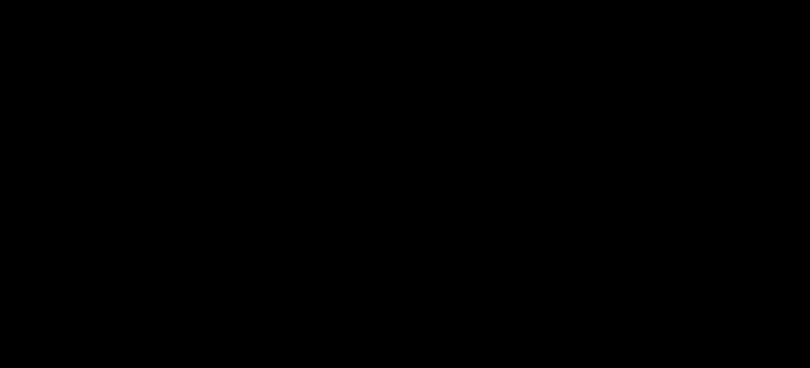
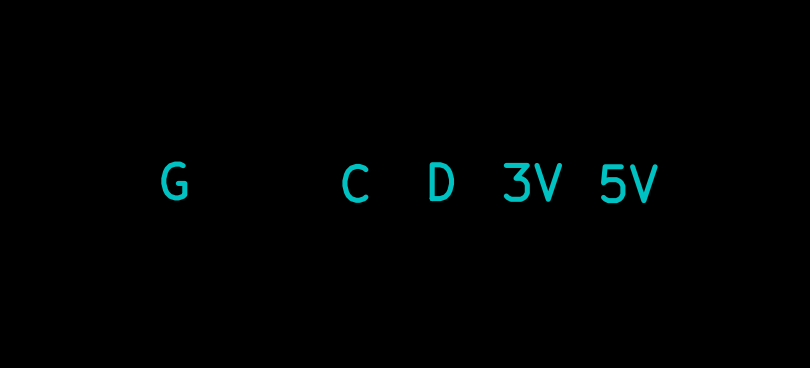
text: none -> G (174, 181)
text: none -> D (441, 181)
text: none -> 3V (532, 182)
text: none -> C (355, 183)
text: none -> 5V (629, 183)

